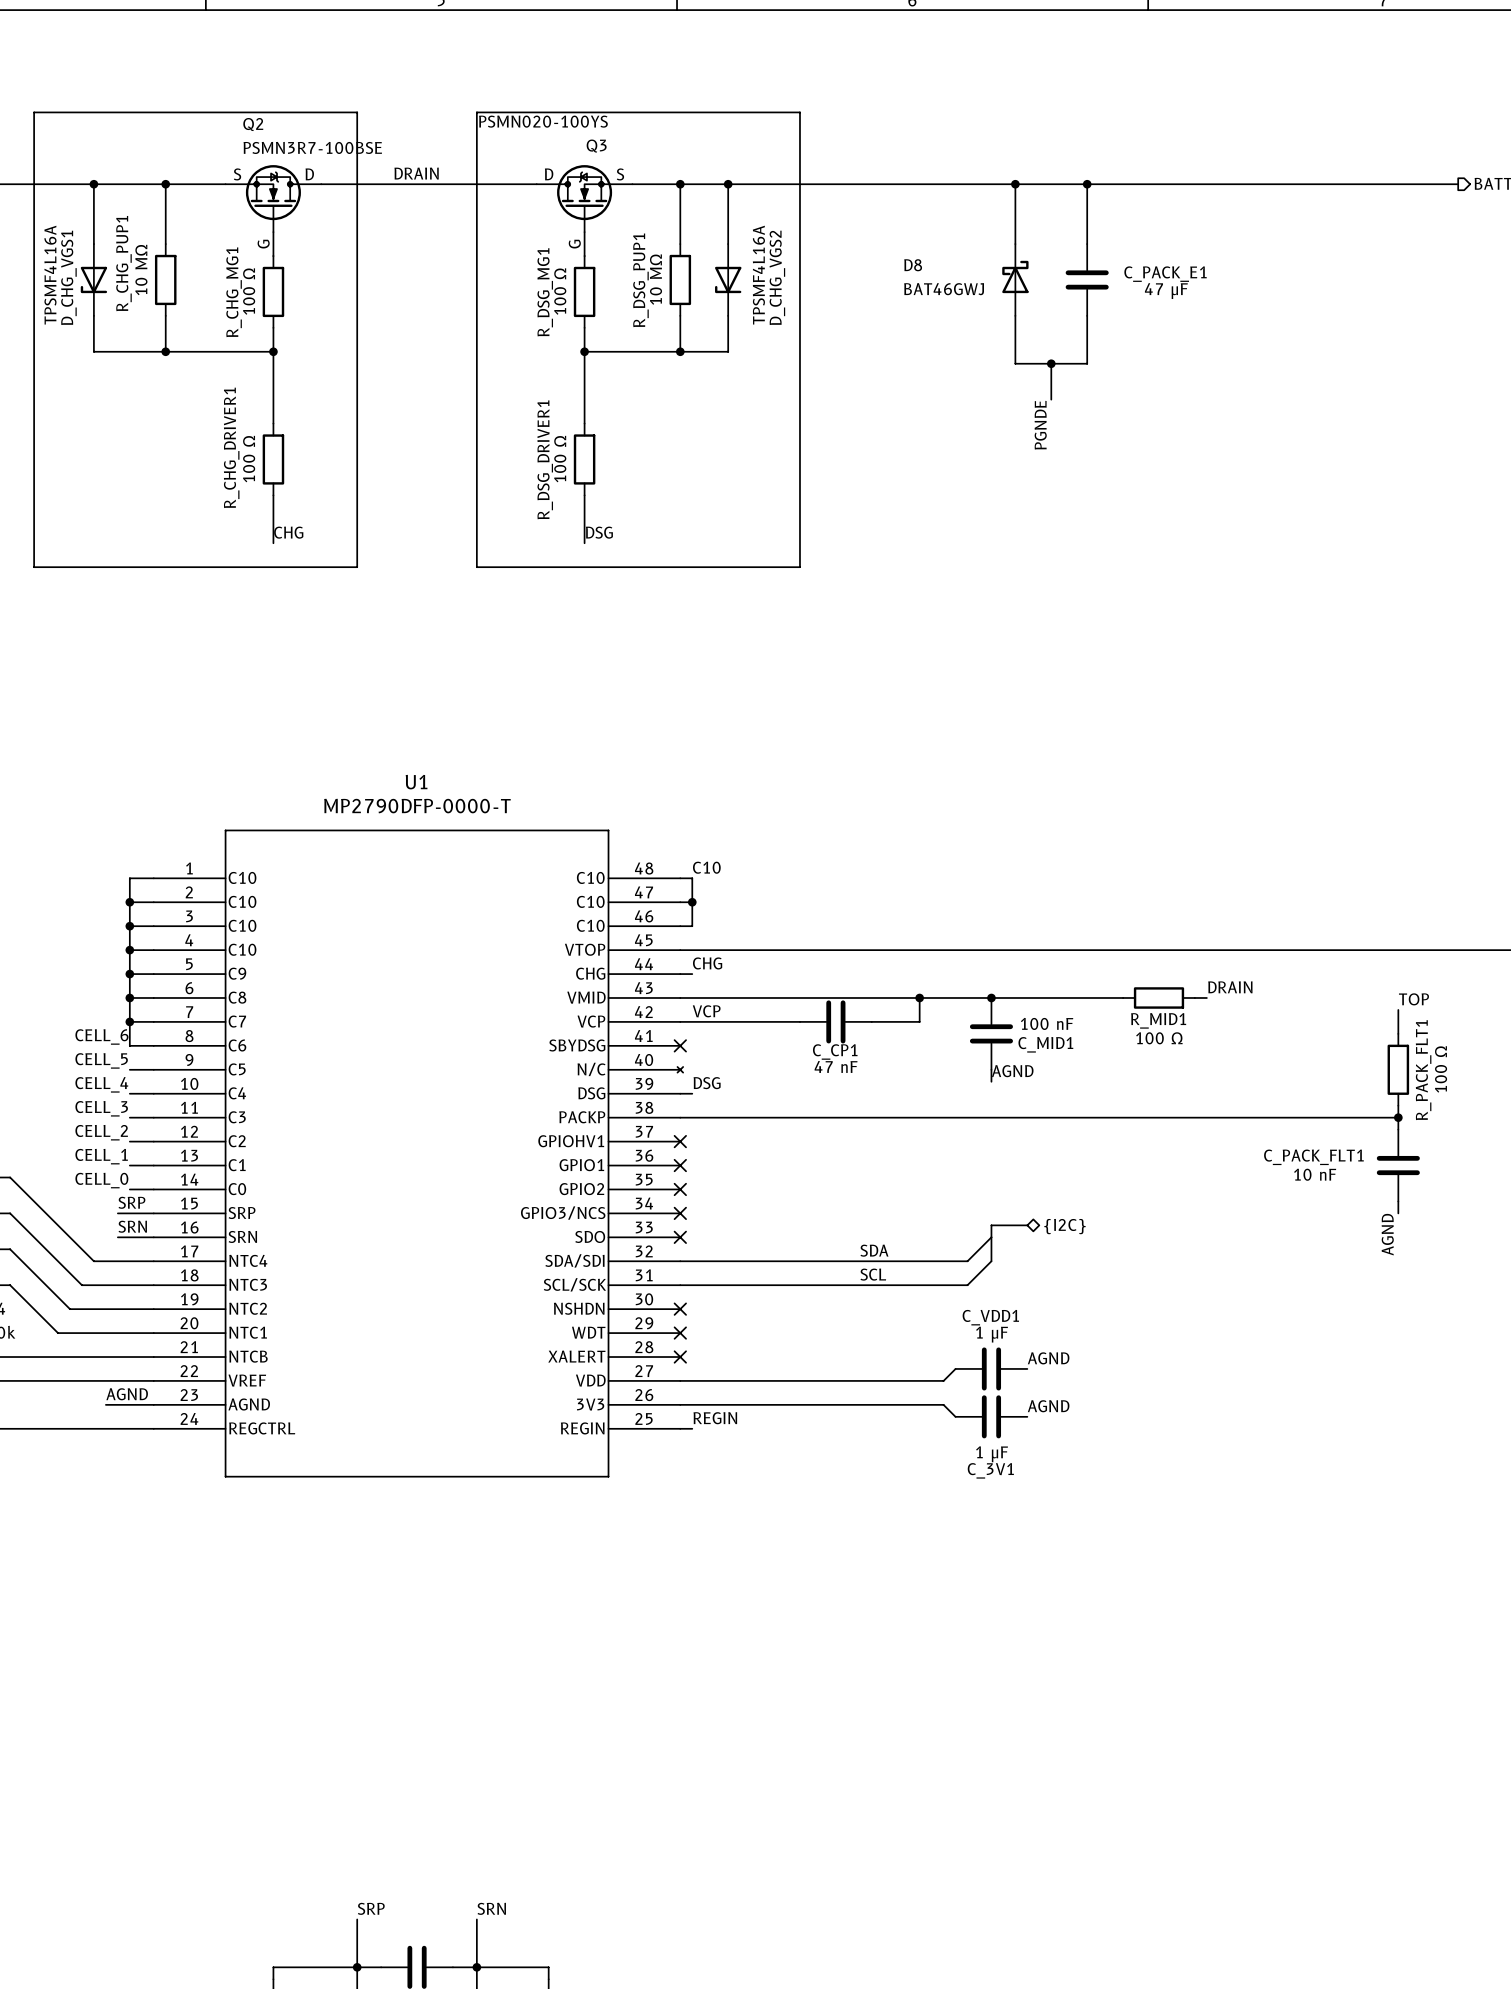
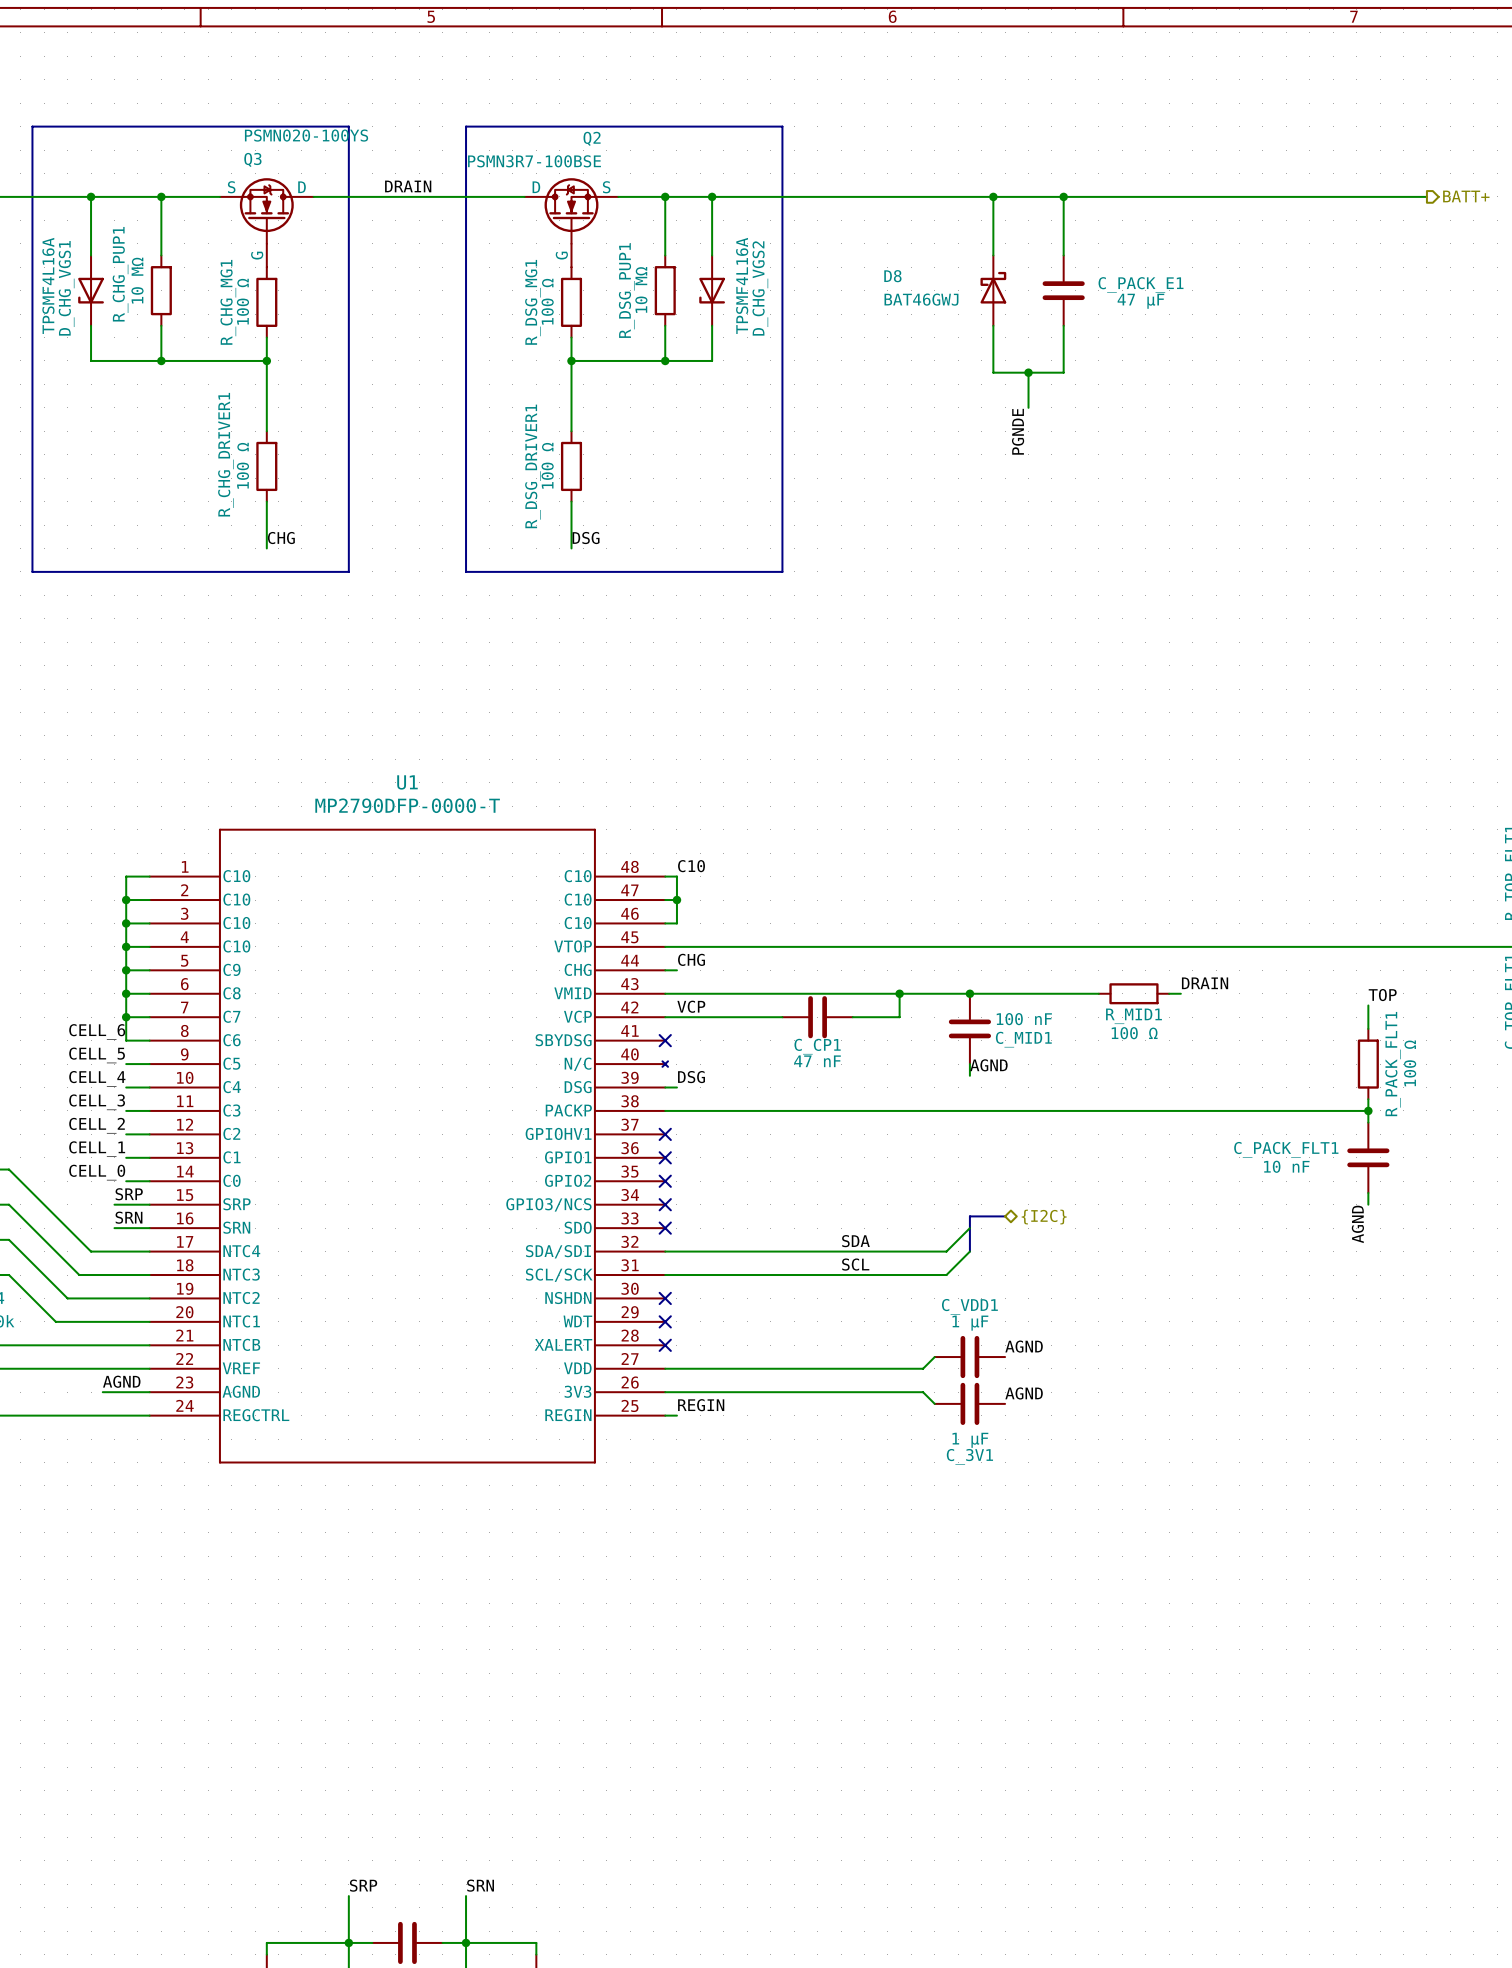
Q3 value: PSMN020-100YS (543, 121) -> PSMN3R7-100BSE (534, 161)
Q2 name: Q2 (253, 124) -> Q3 (252, 159)
Q3 name: Q3 (596, 146) -> Q2 (592, 138)
Q2 value: PSMN3R7-100BSE (312, 147) -> PSMN020-100YS (306, 135)

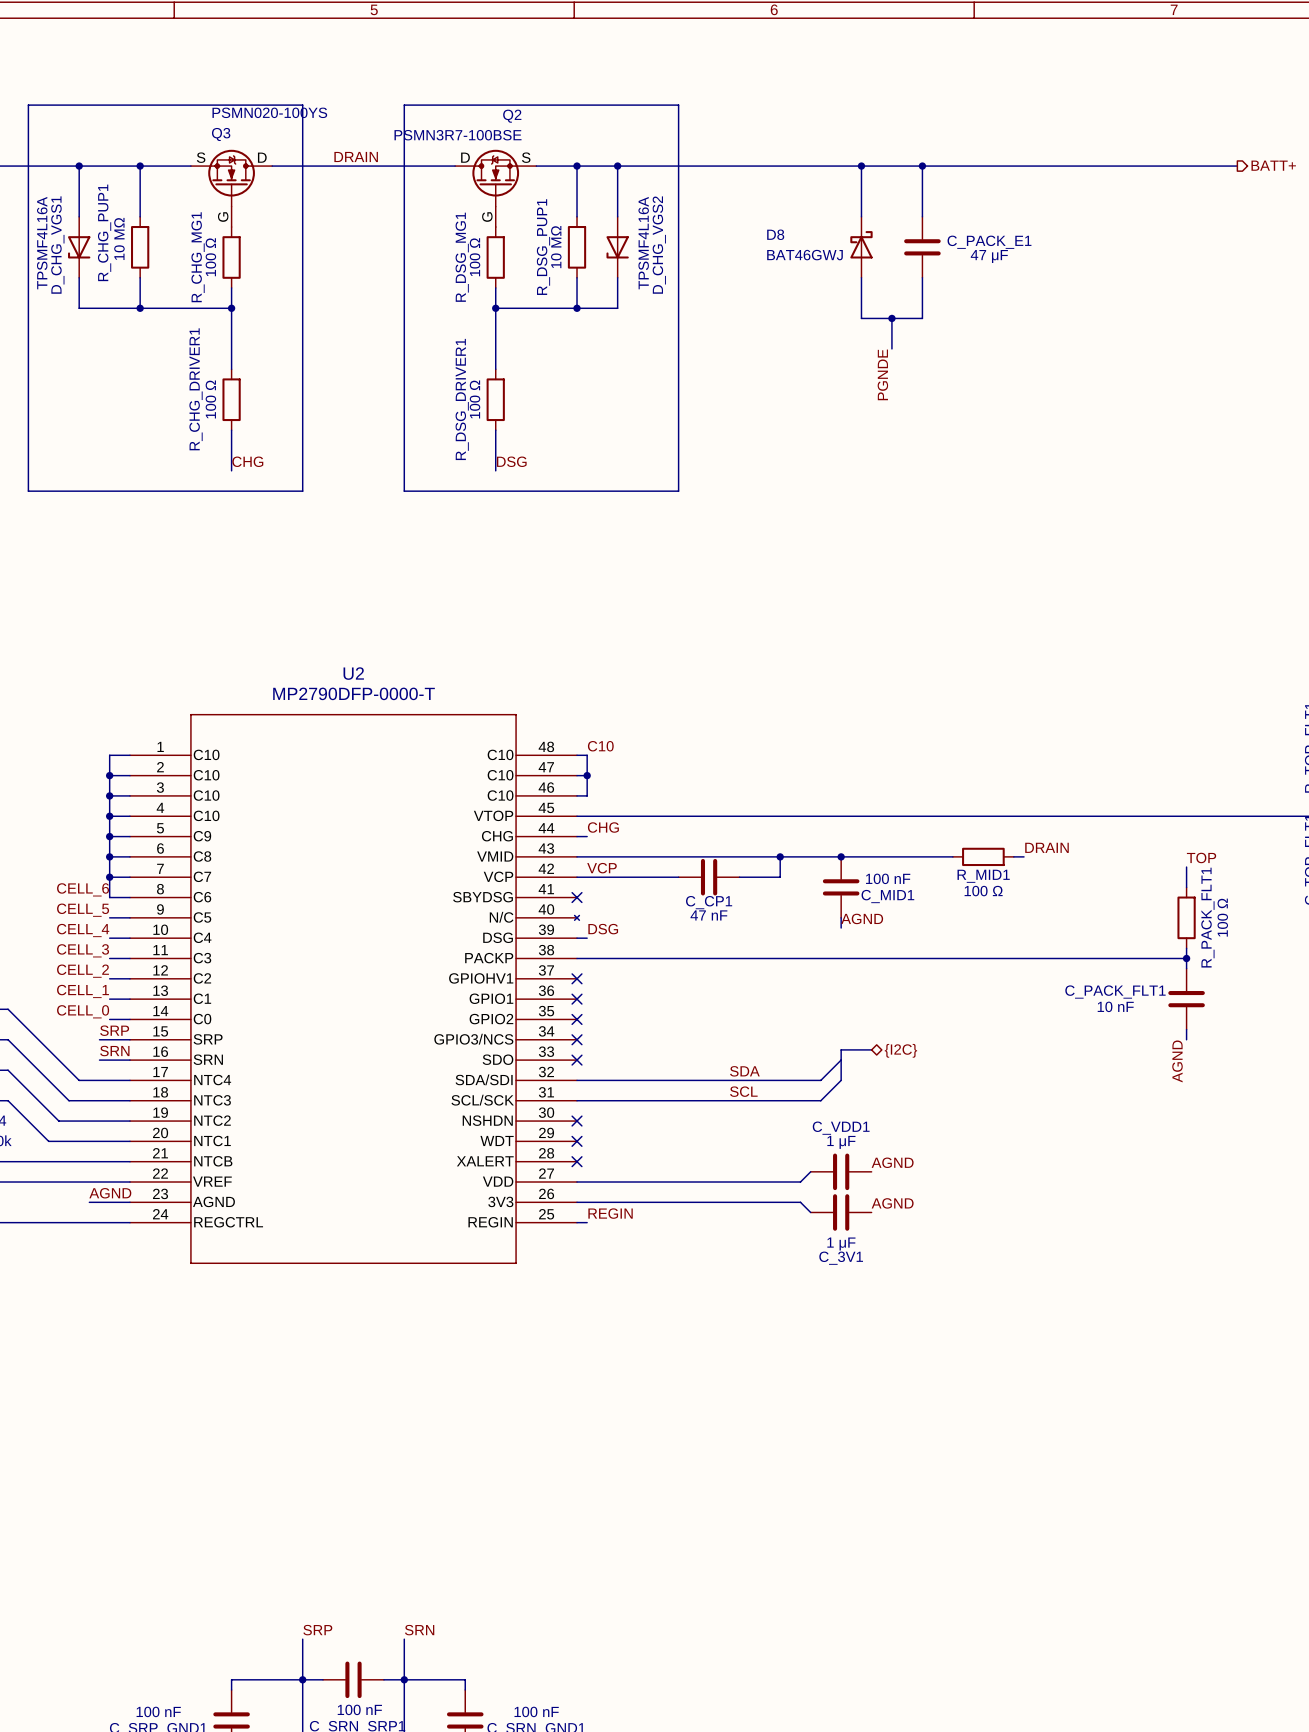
U1 name: U1 (407, 782) -> U2 (353, 673)

